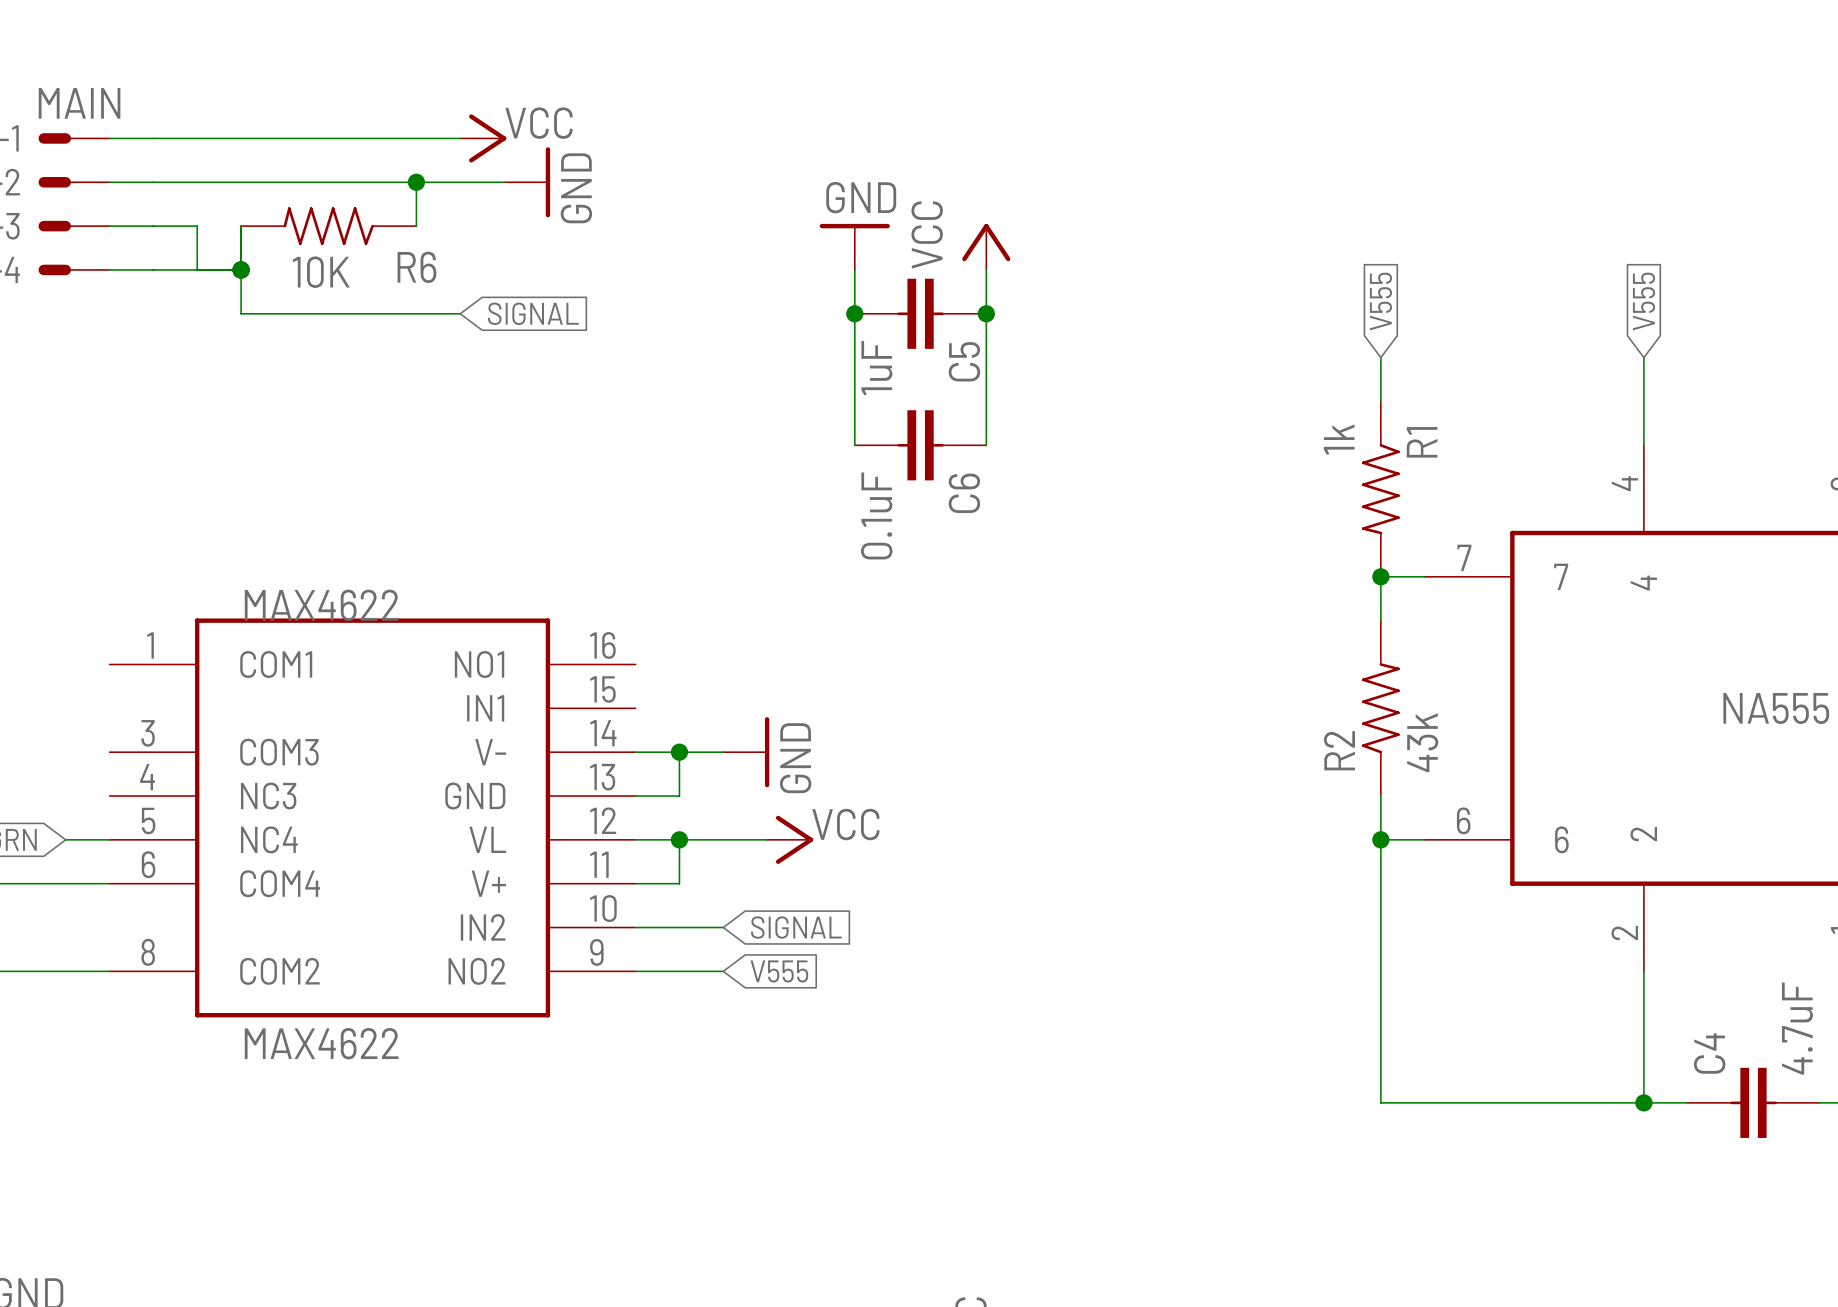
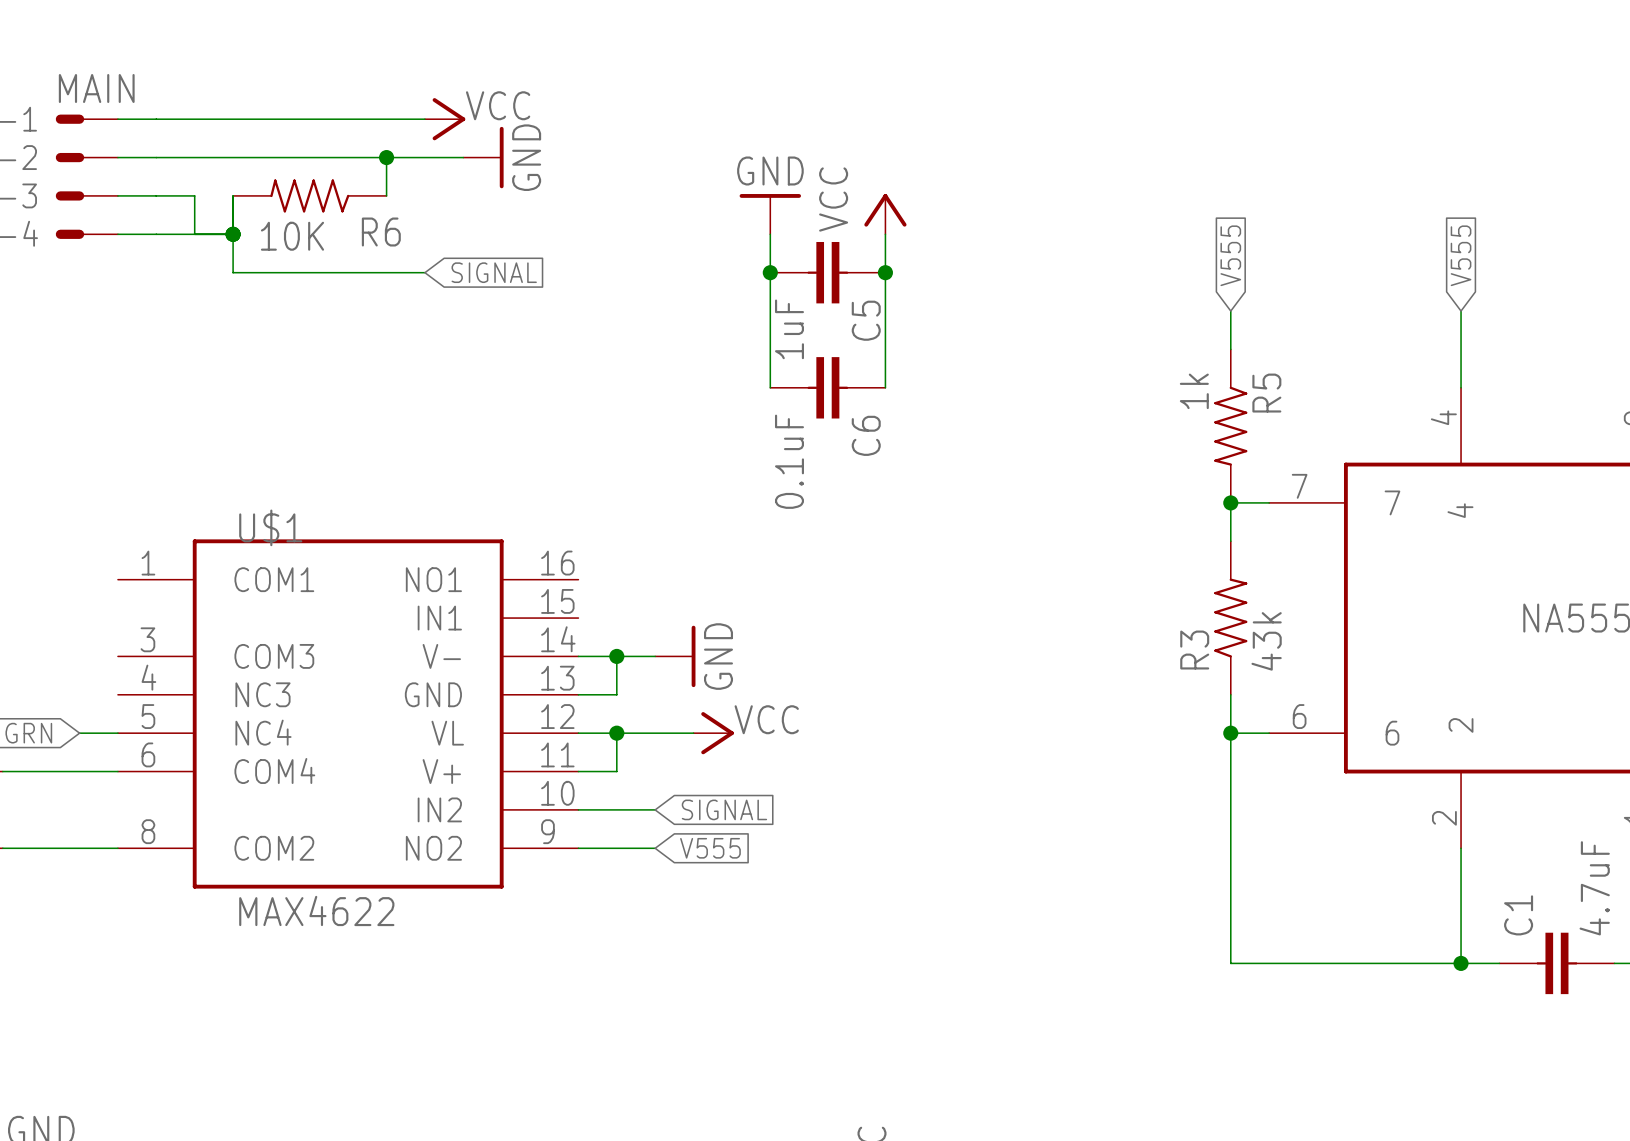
R1 name: R1 (1422, 442) -> R5 (1266, 393)
MAX4622 name: MAX4622 (321, 605) -> U$1 (270, 527)
R2 name: R2 (1339, 750) -> R3 (1194, 650)
C4 name: C4 (1709, 1053) -> C1 (1518, 915)

